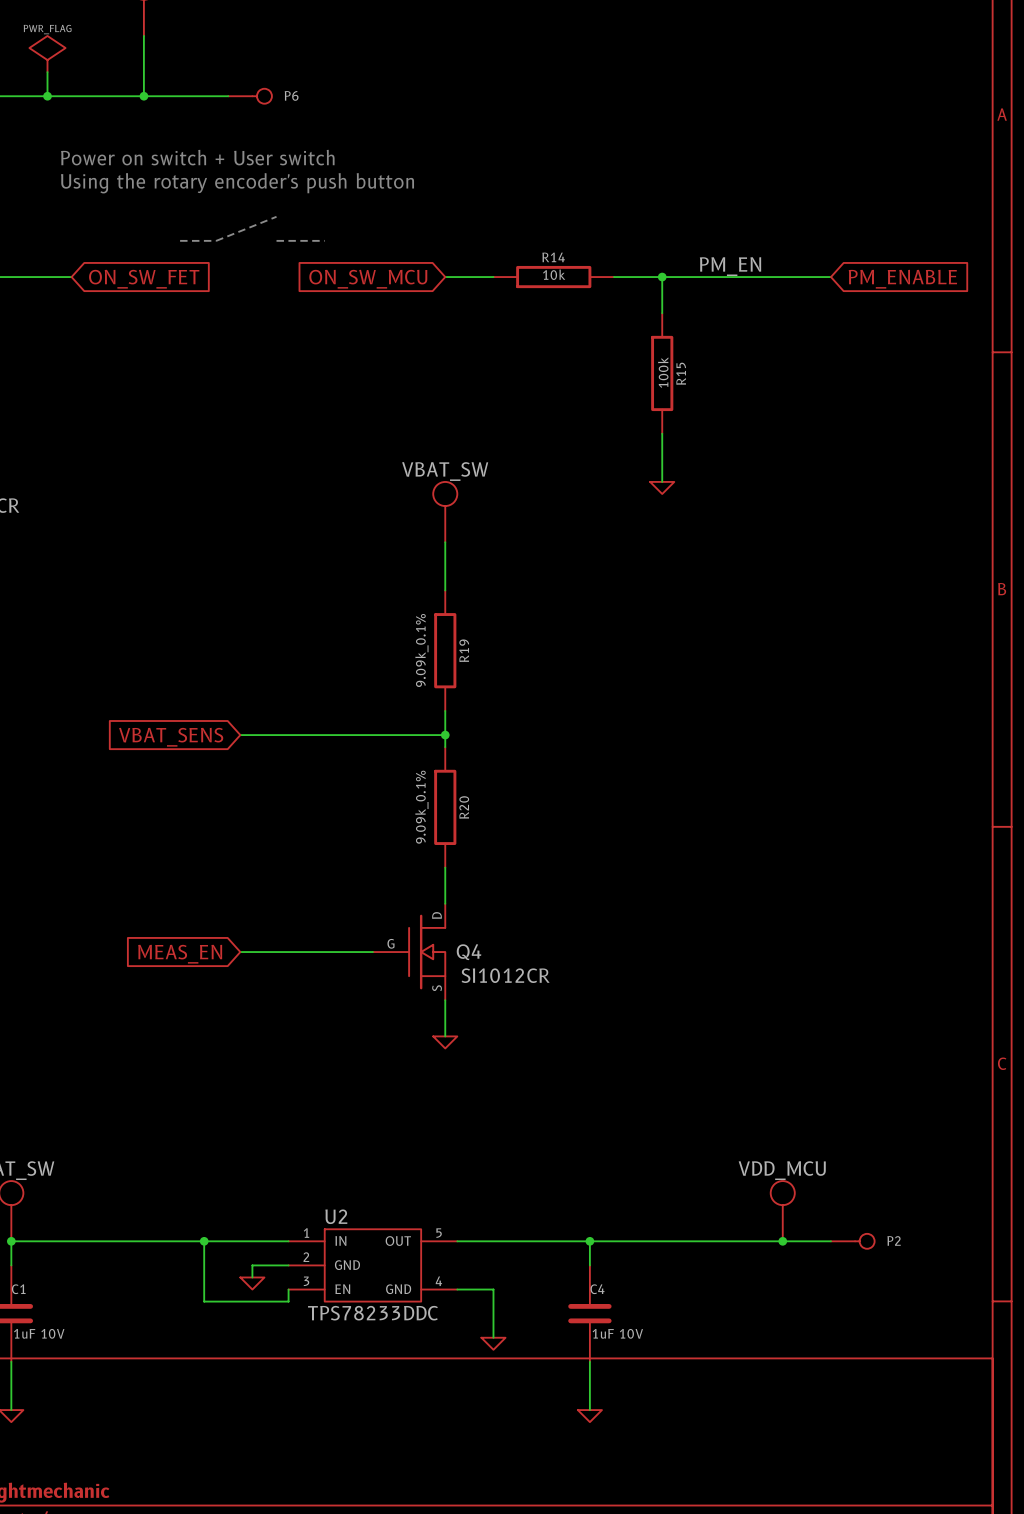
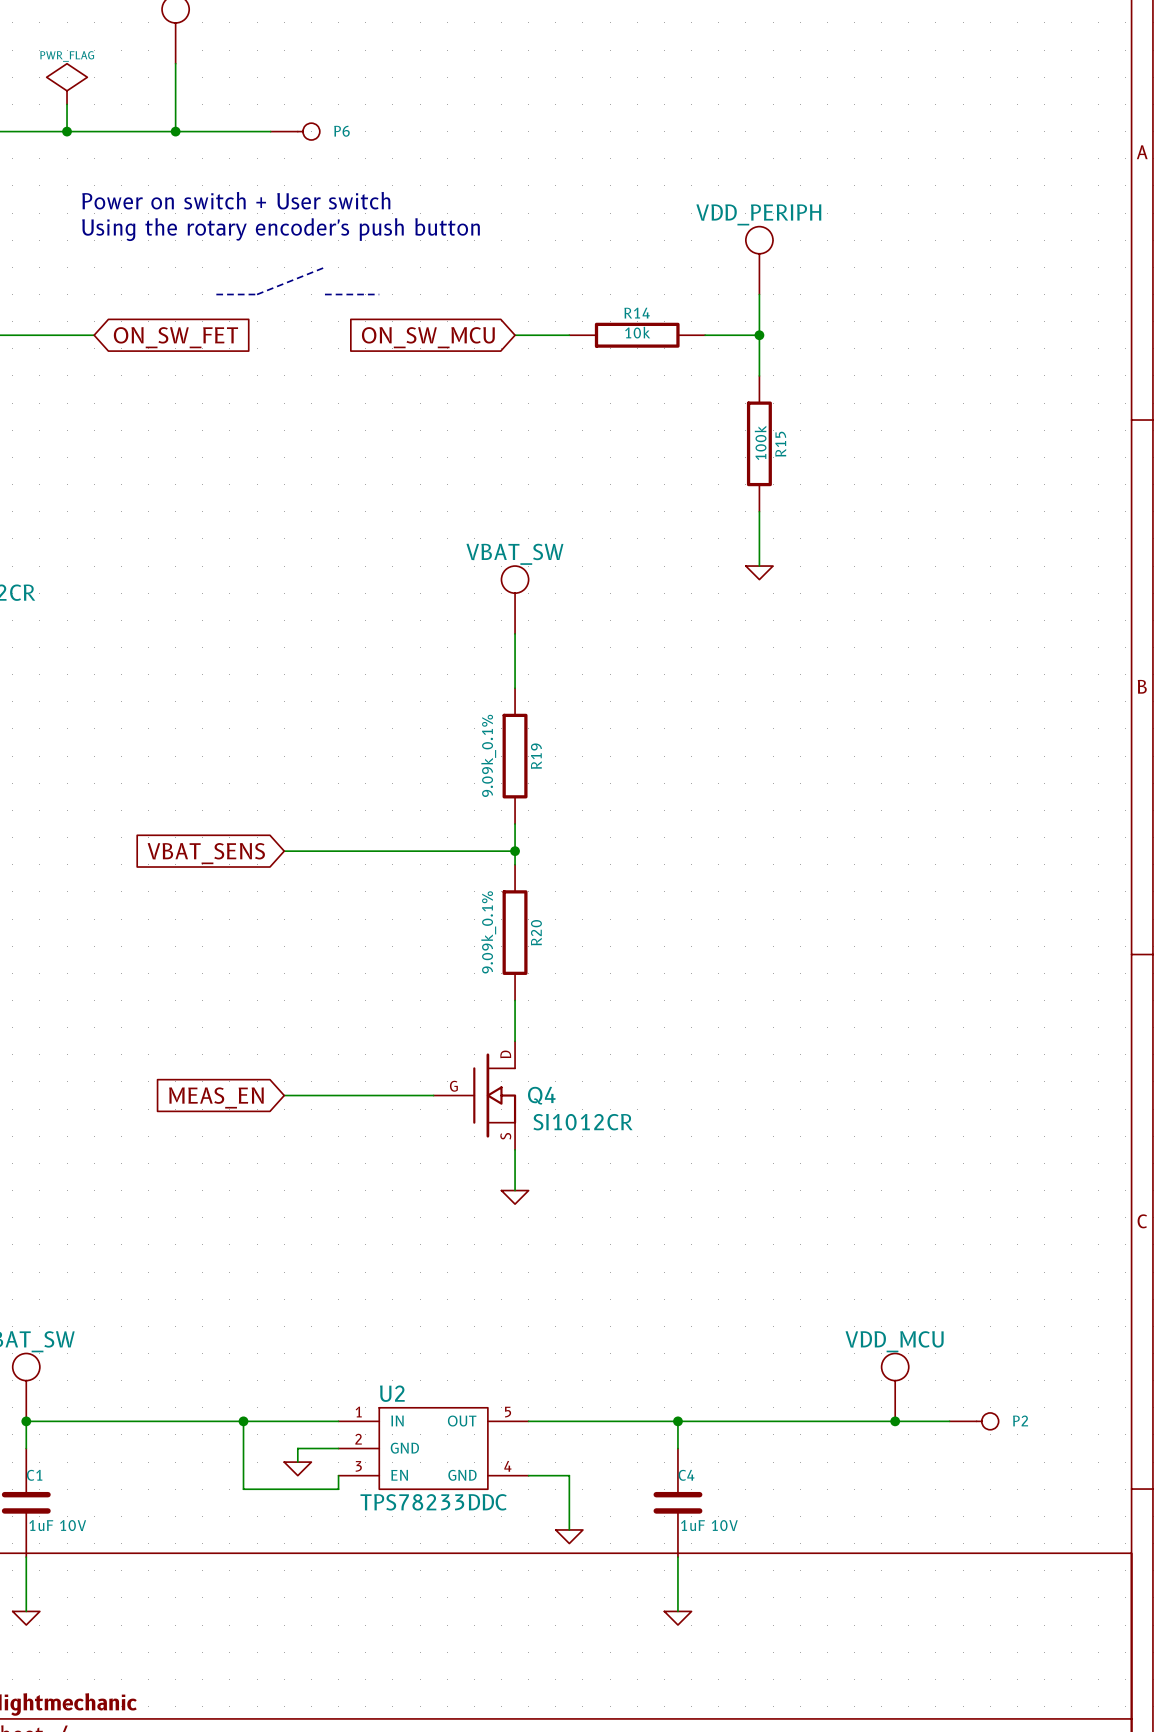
power symbol: none -> VDD_PERIPH (759, 260)
label: PM_EN (730, 266) -> none
wire: (662, 277) (830, 277) -> (759, 335) (759, 294)
global label: PM_ENABLE (902, 279) -> none

